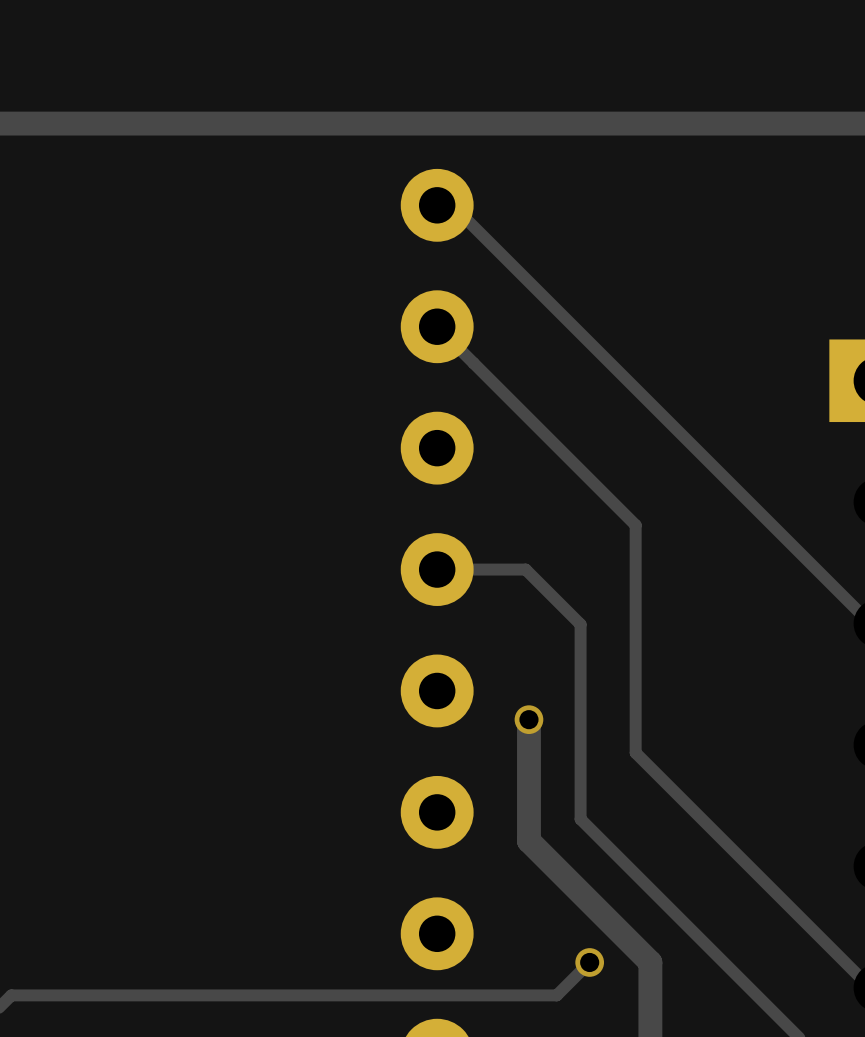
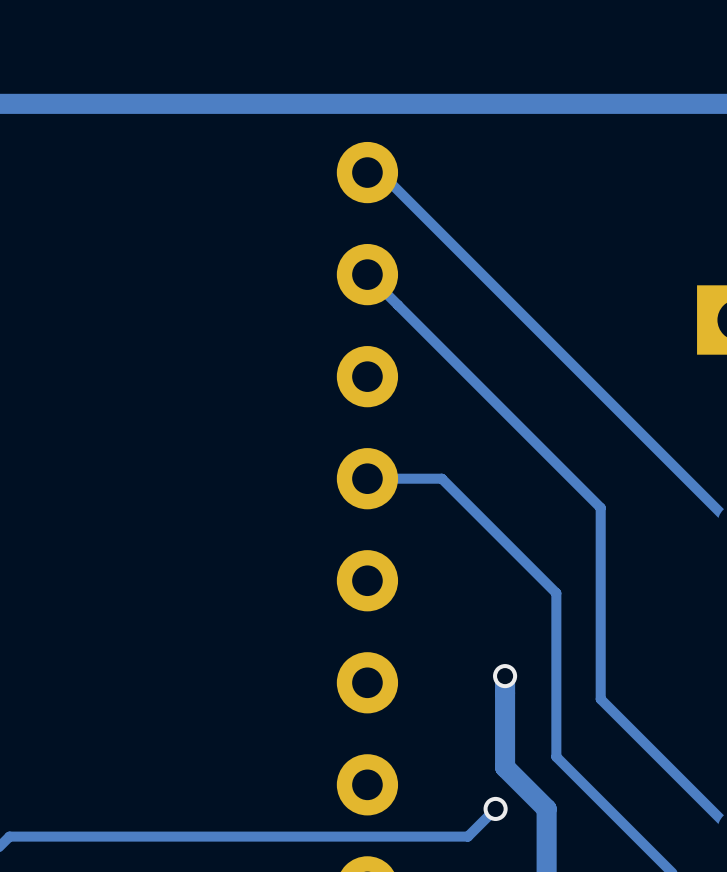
track: (635, 525) (635, 752) (714, 831) -> (534, 441) (600, 507) (600, 699)
track: (580, 624) (580, 819) (661, 900) -> (487, 524) (556, 593) (556, 756)
track: (528, 719) (528, 841) (600, 913) -> (505, 676) (505, 767)
via position: (528, 719) -> (505, 676)

